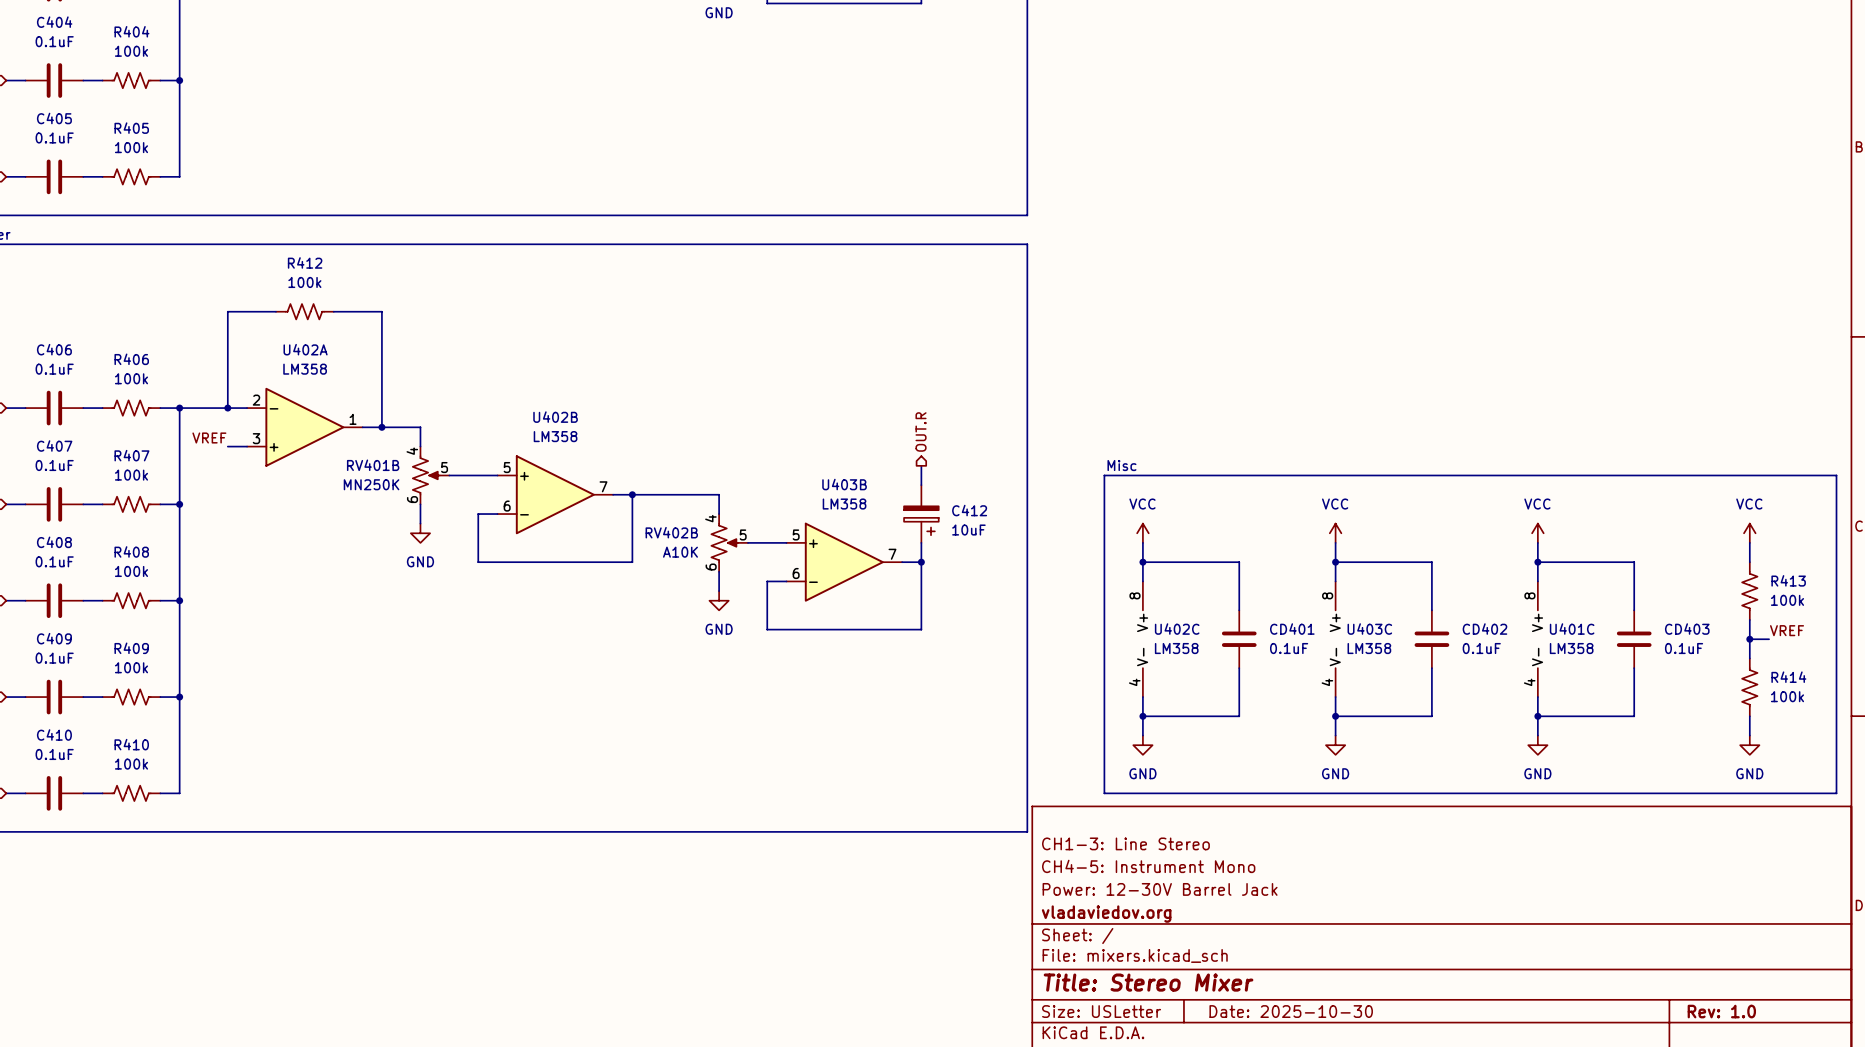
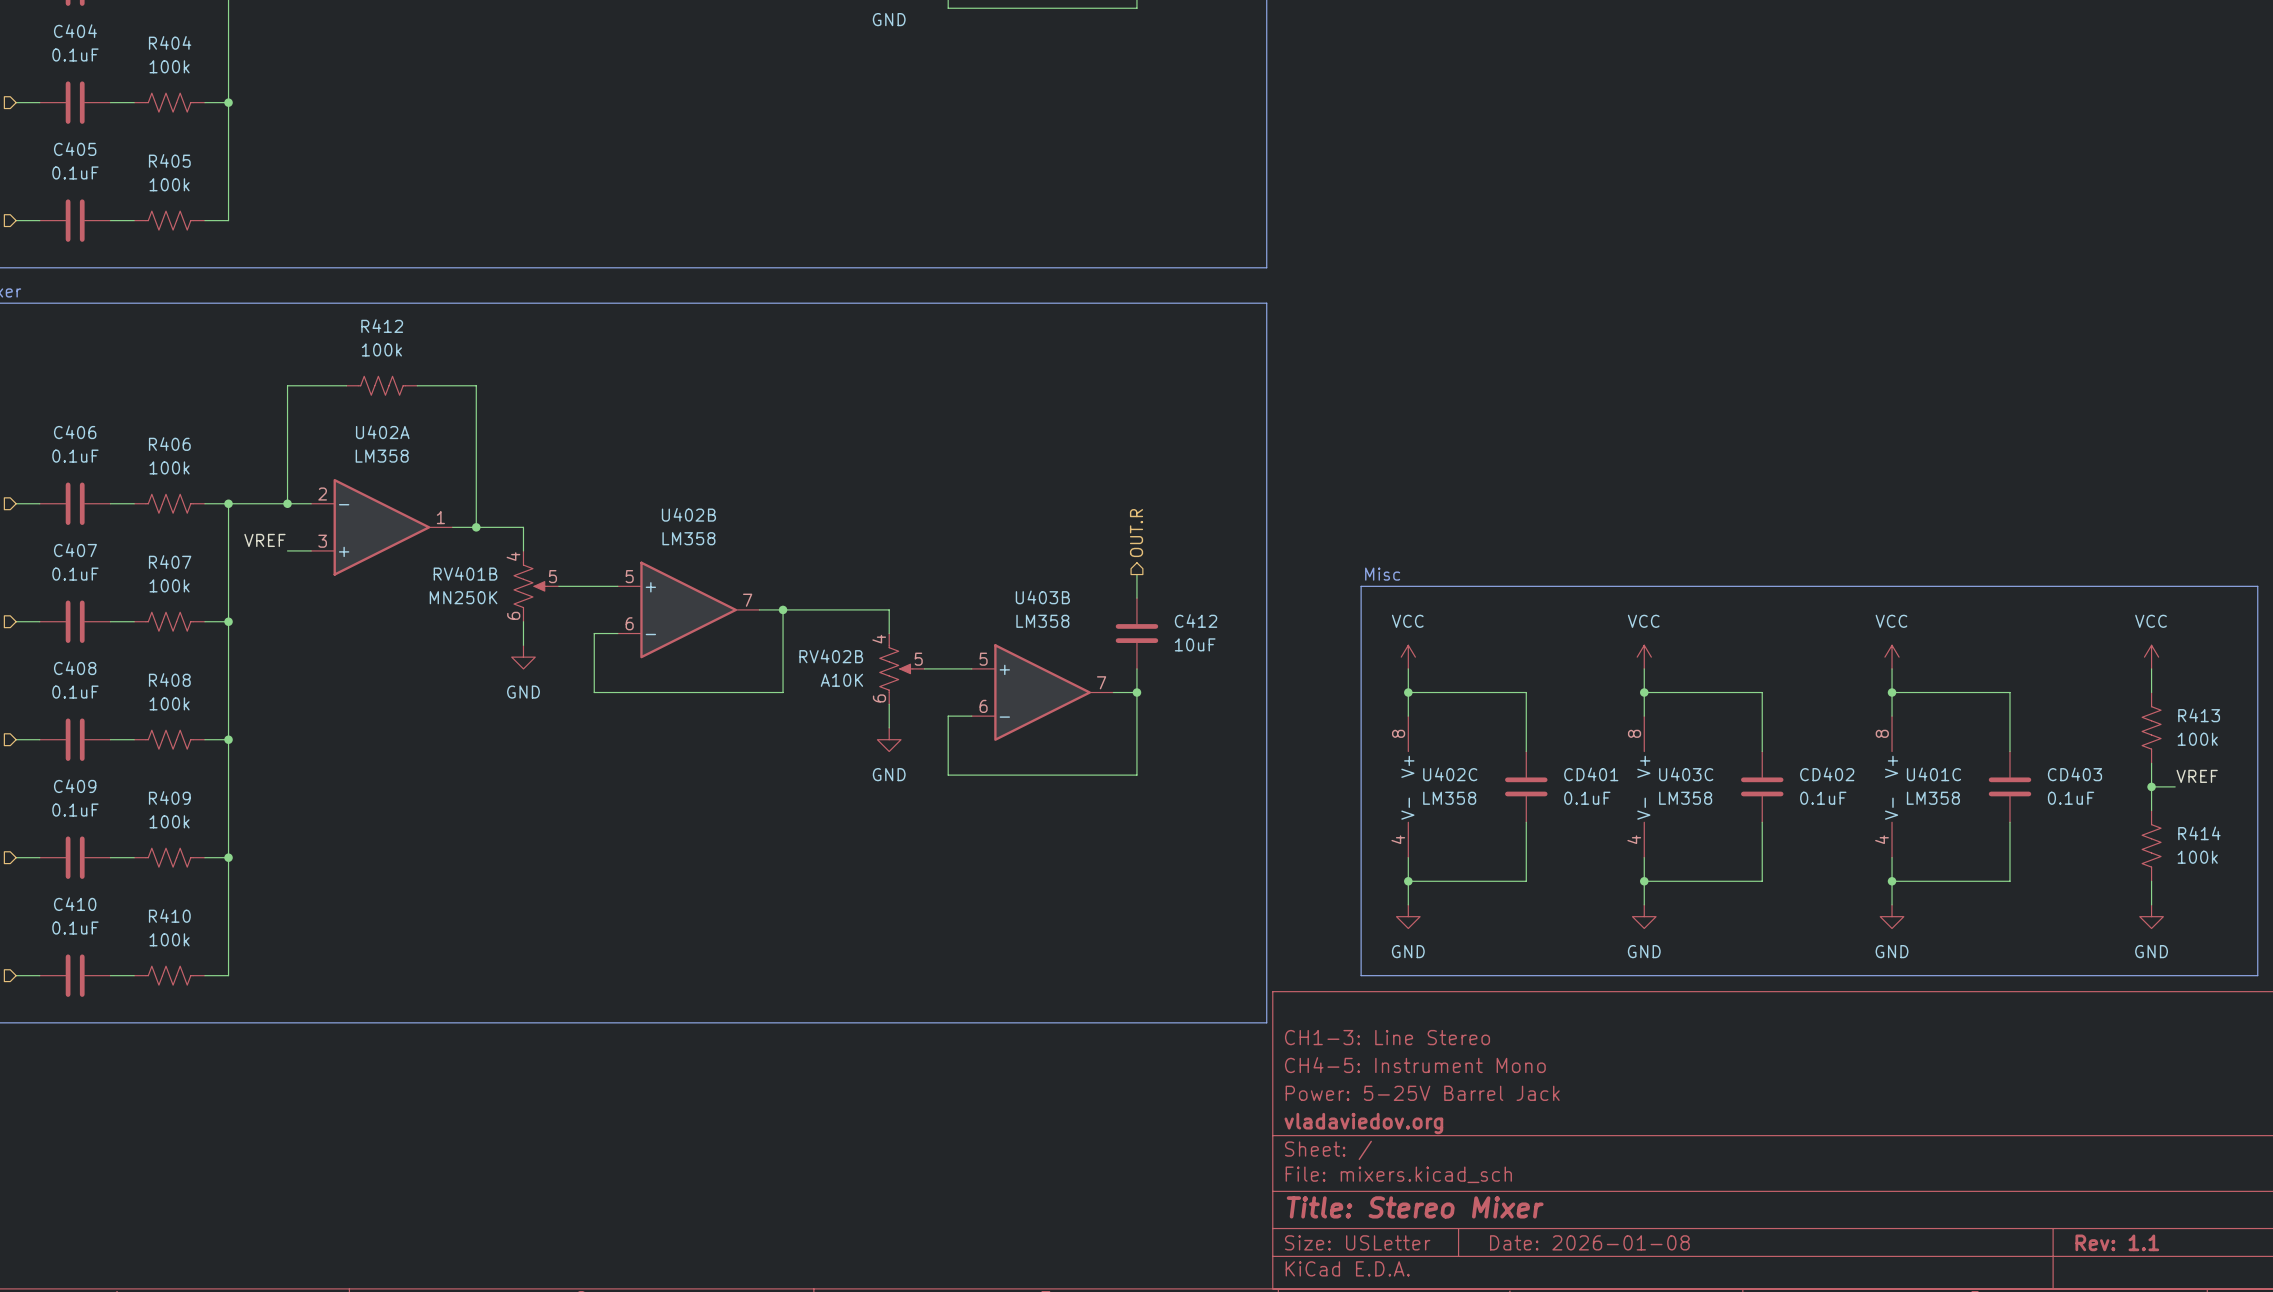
C412 symbol: [904, 485, 939, 543] -> [1115, 598, 1159, 669]
title block: Power: 12-30V Barrel Jack (1160, 889) -> Power: 5-25V Barrel Jack (1422, 1093)
title block: Date: 2025-10-30 (1291, 1011) -> Date: 2026-01-08 (1589, 1242)
title block: Rev: 1.0 (1721, 1011) -> Rev: 1.1 (2117, 1242)

